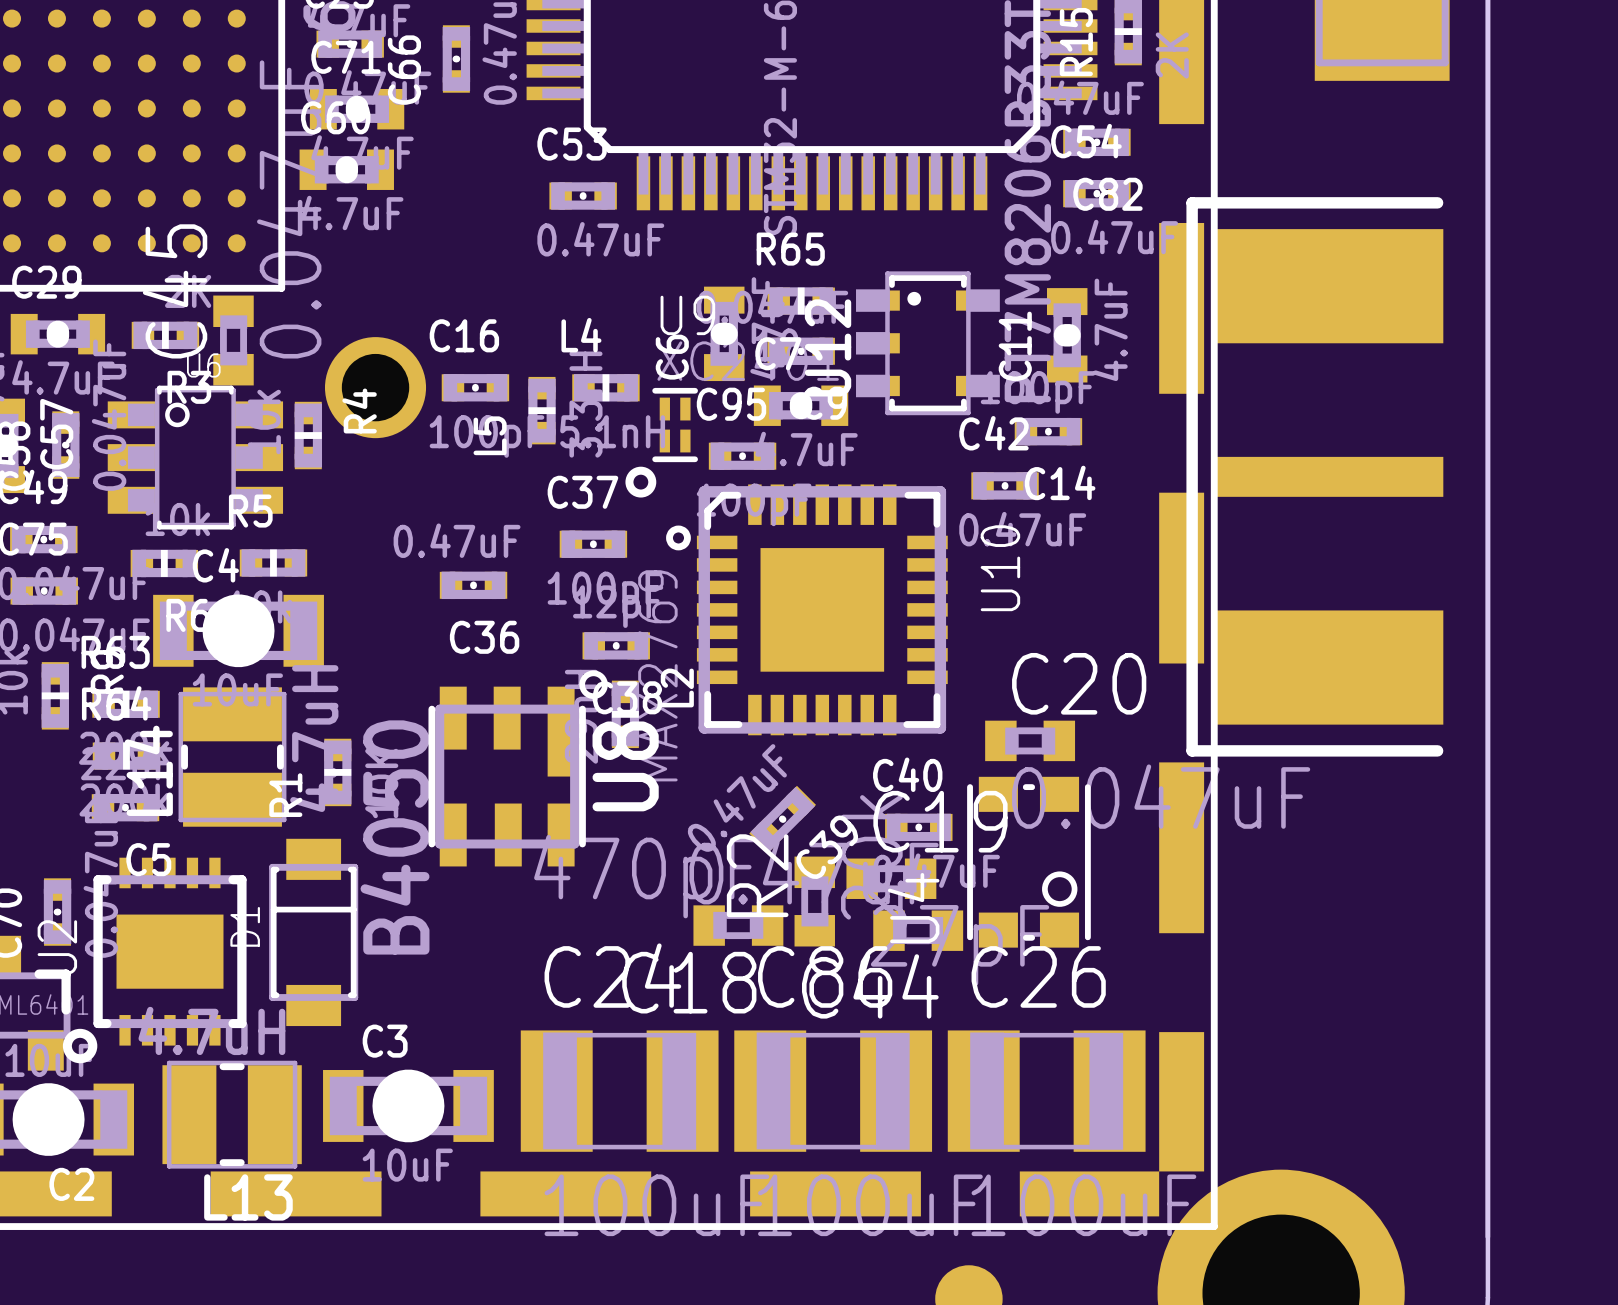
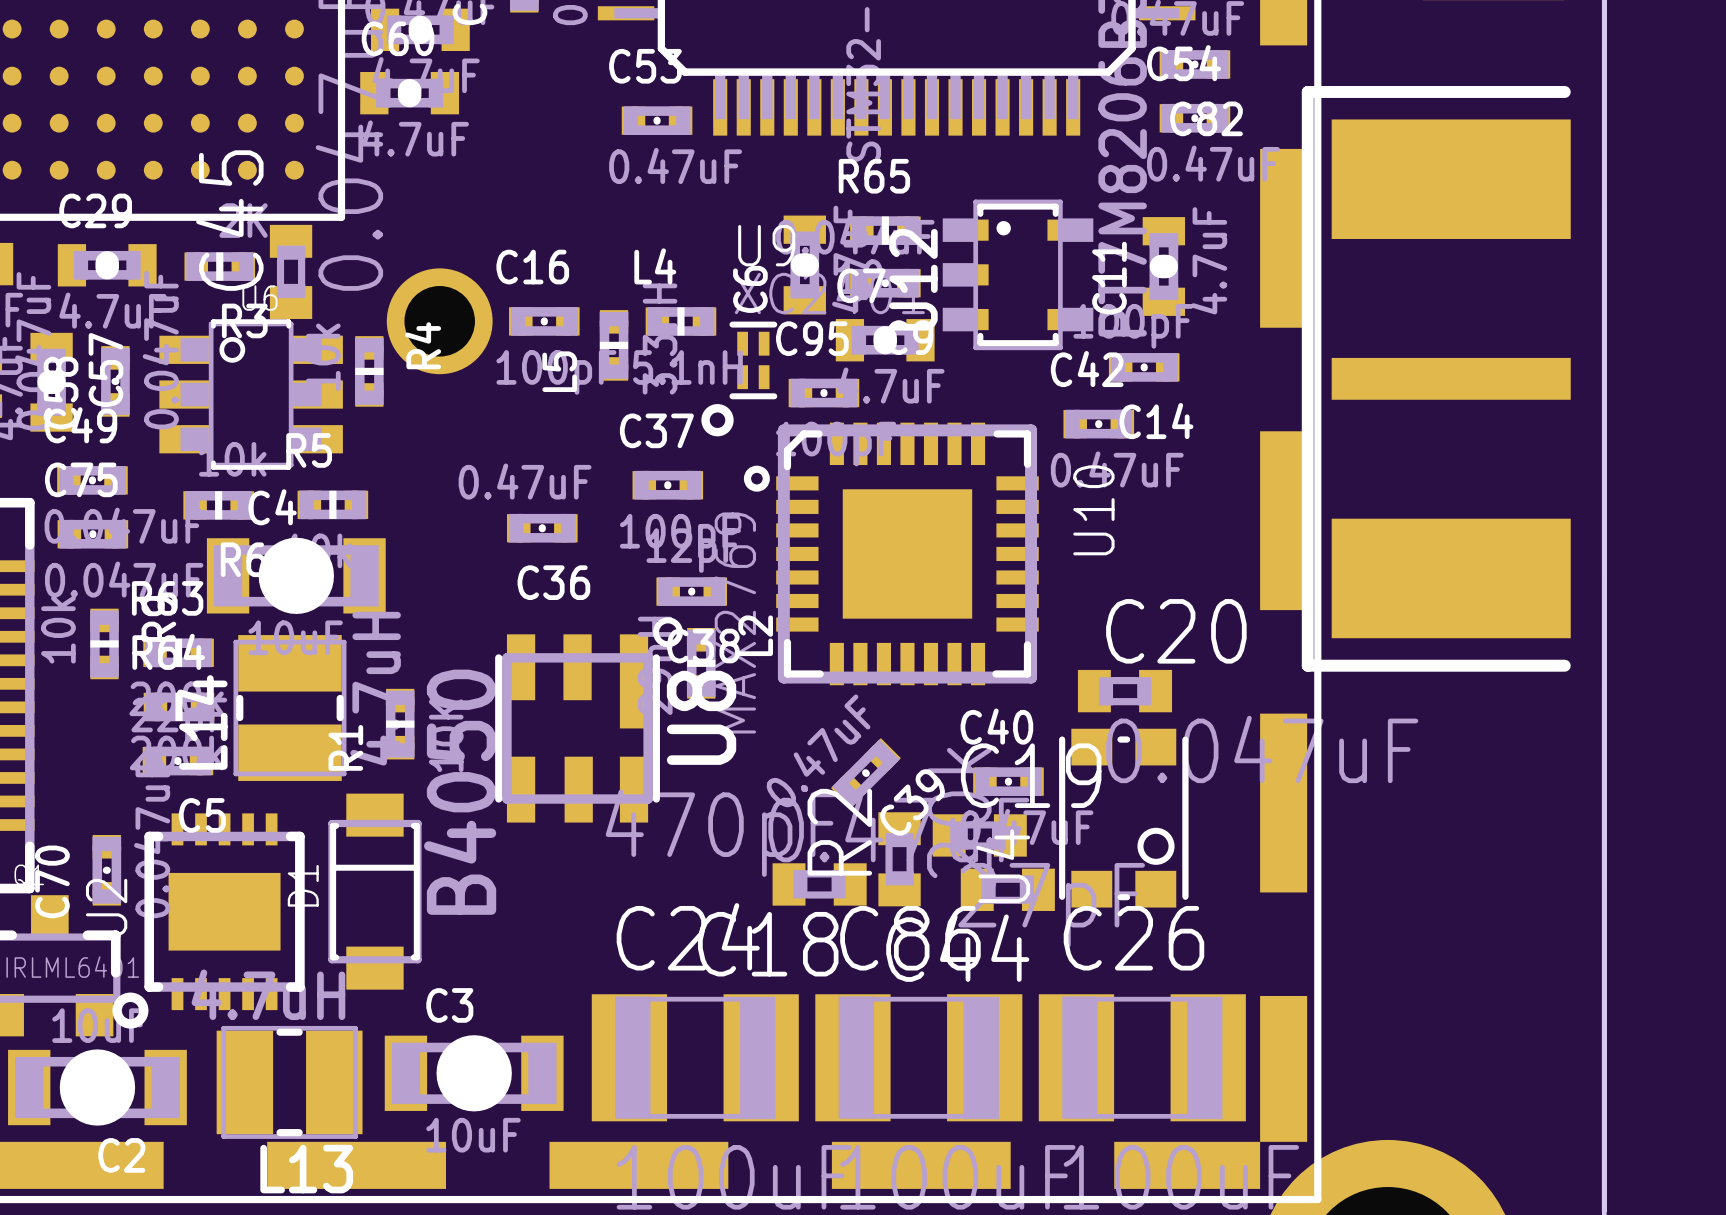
part position: (1314, 476) -> (1436, 378)

